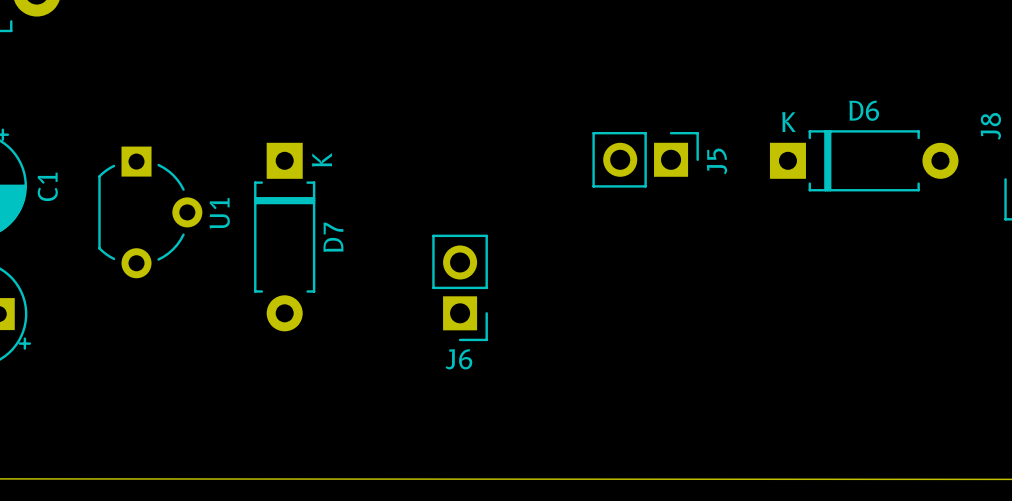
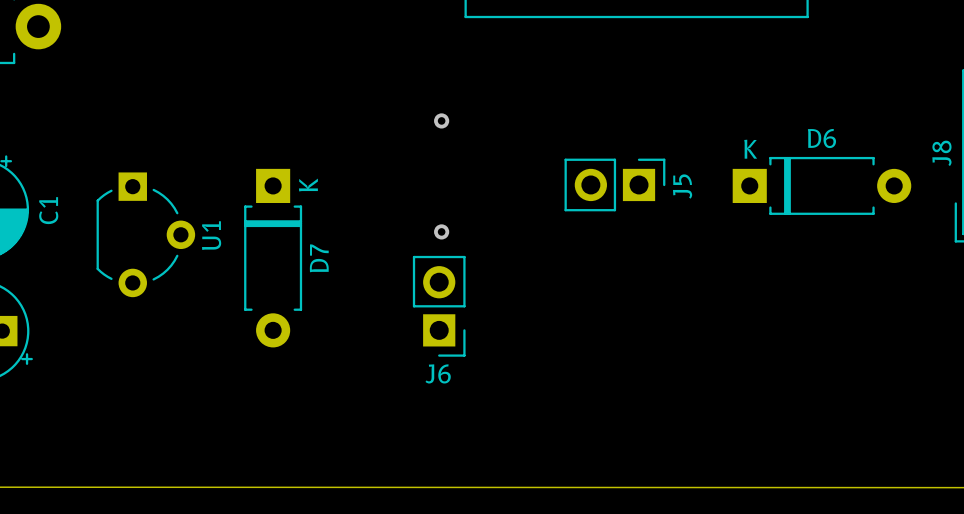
via: none -> (441, 120)
via: none -> (441, 231)

